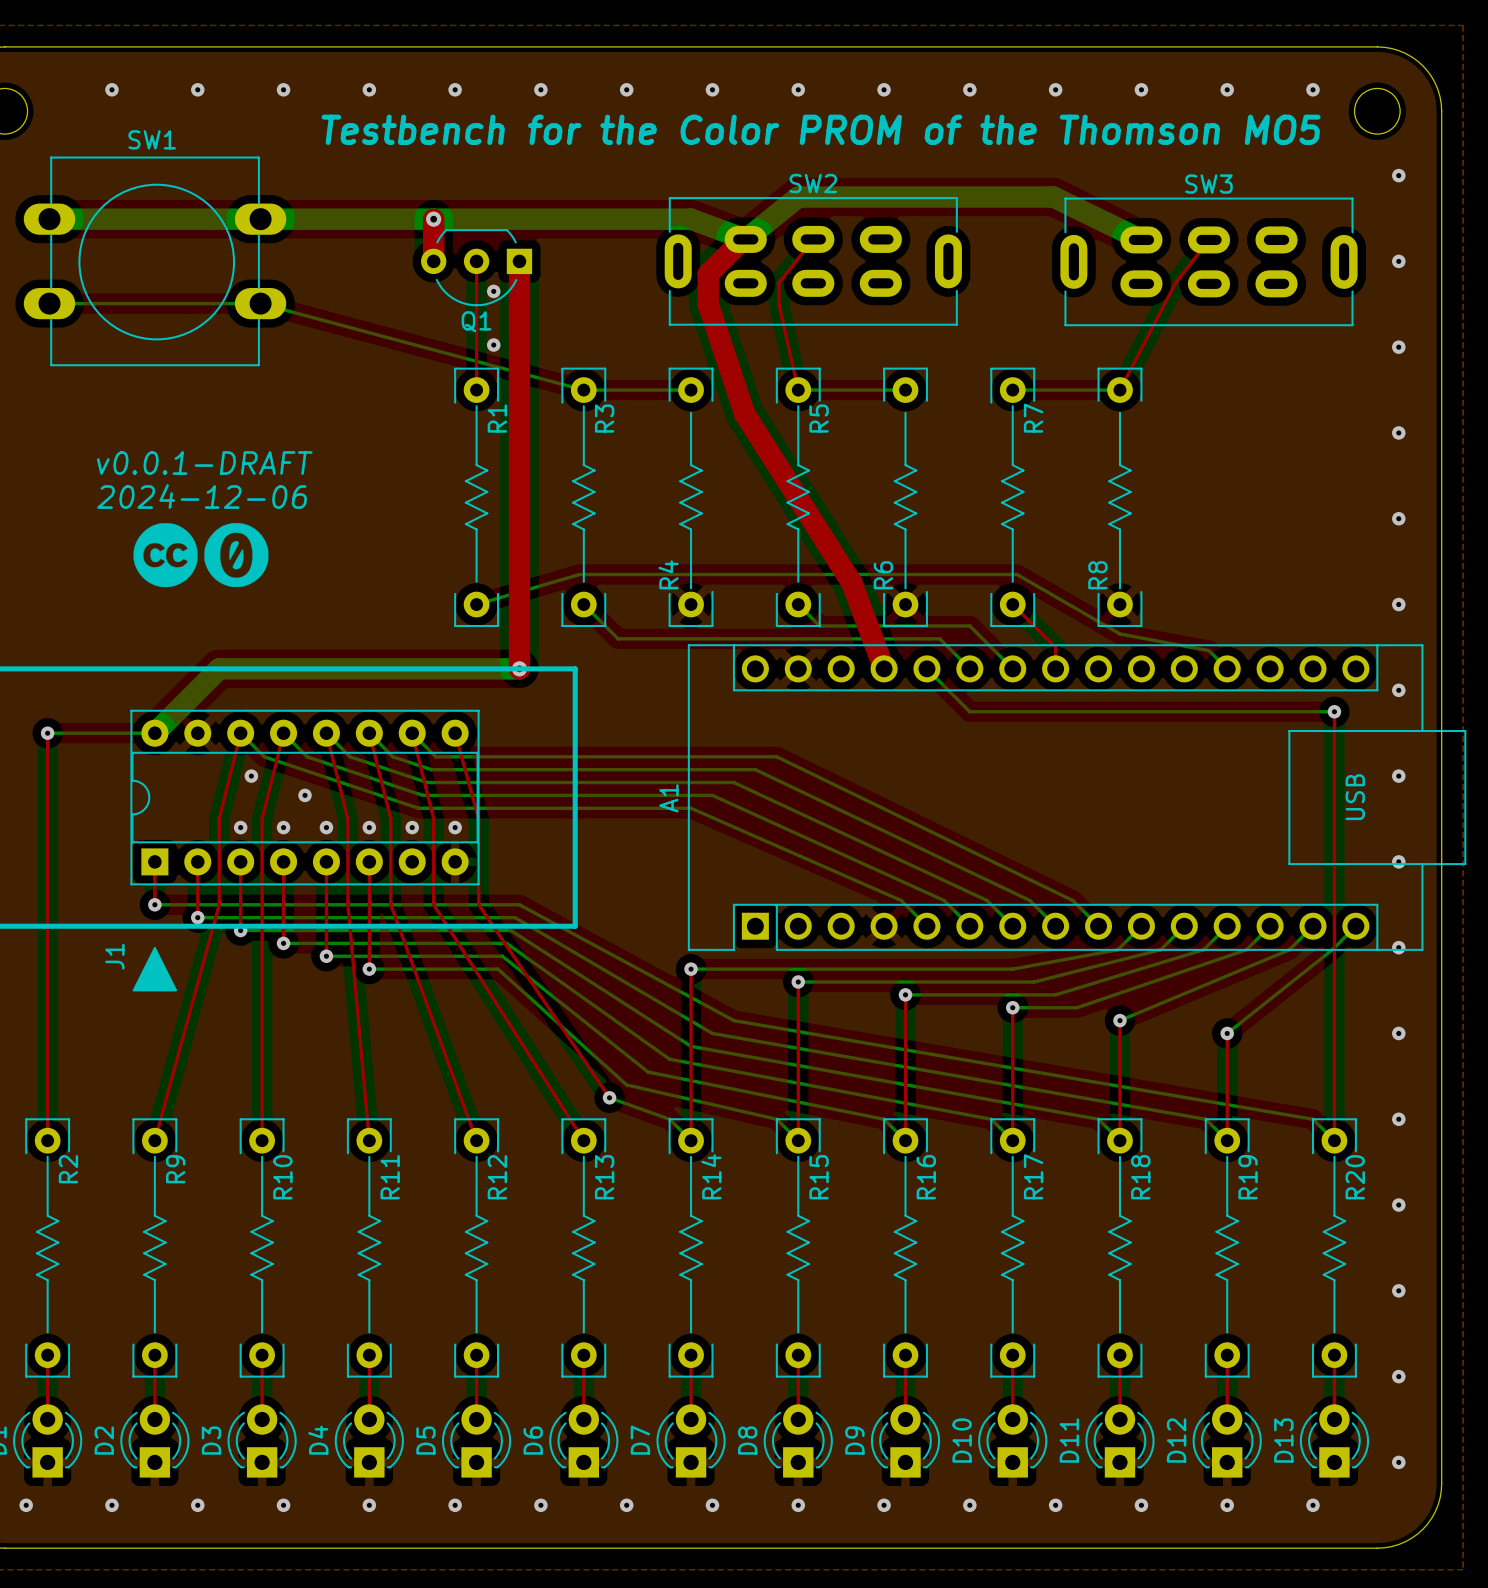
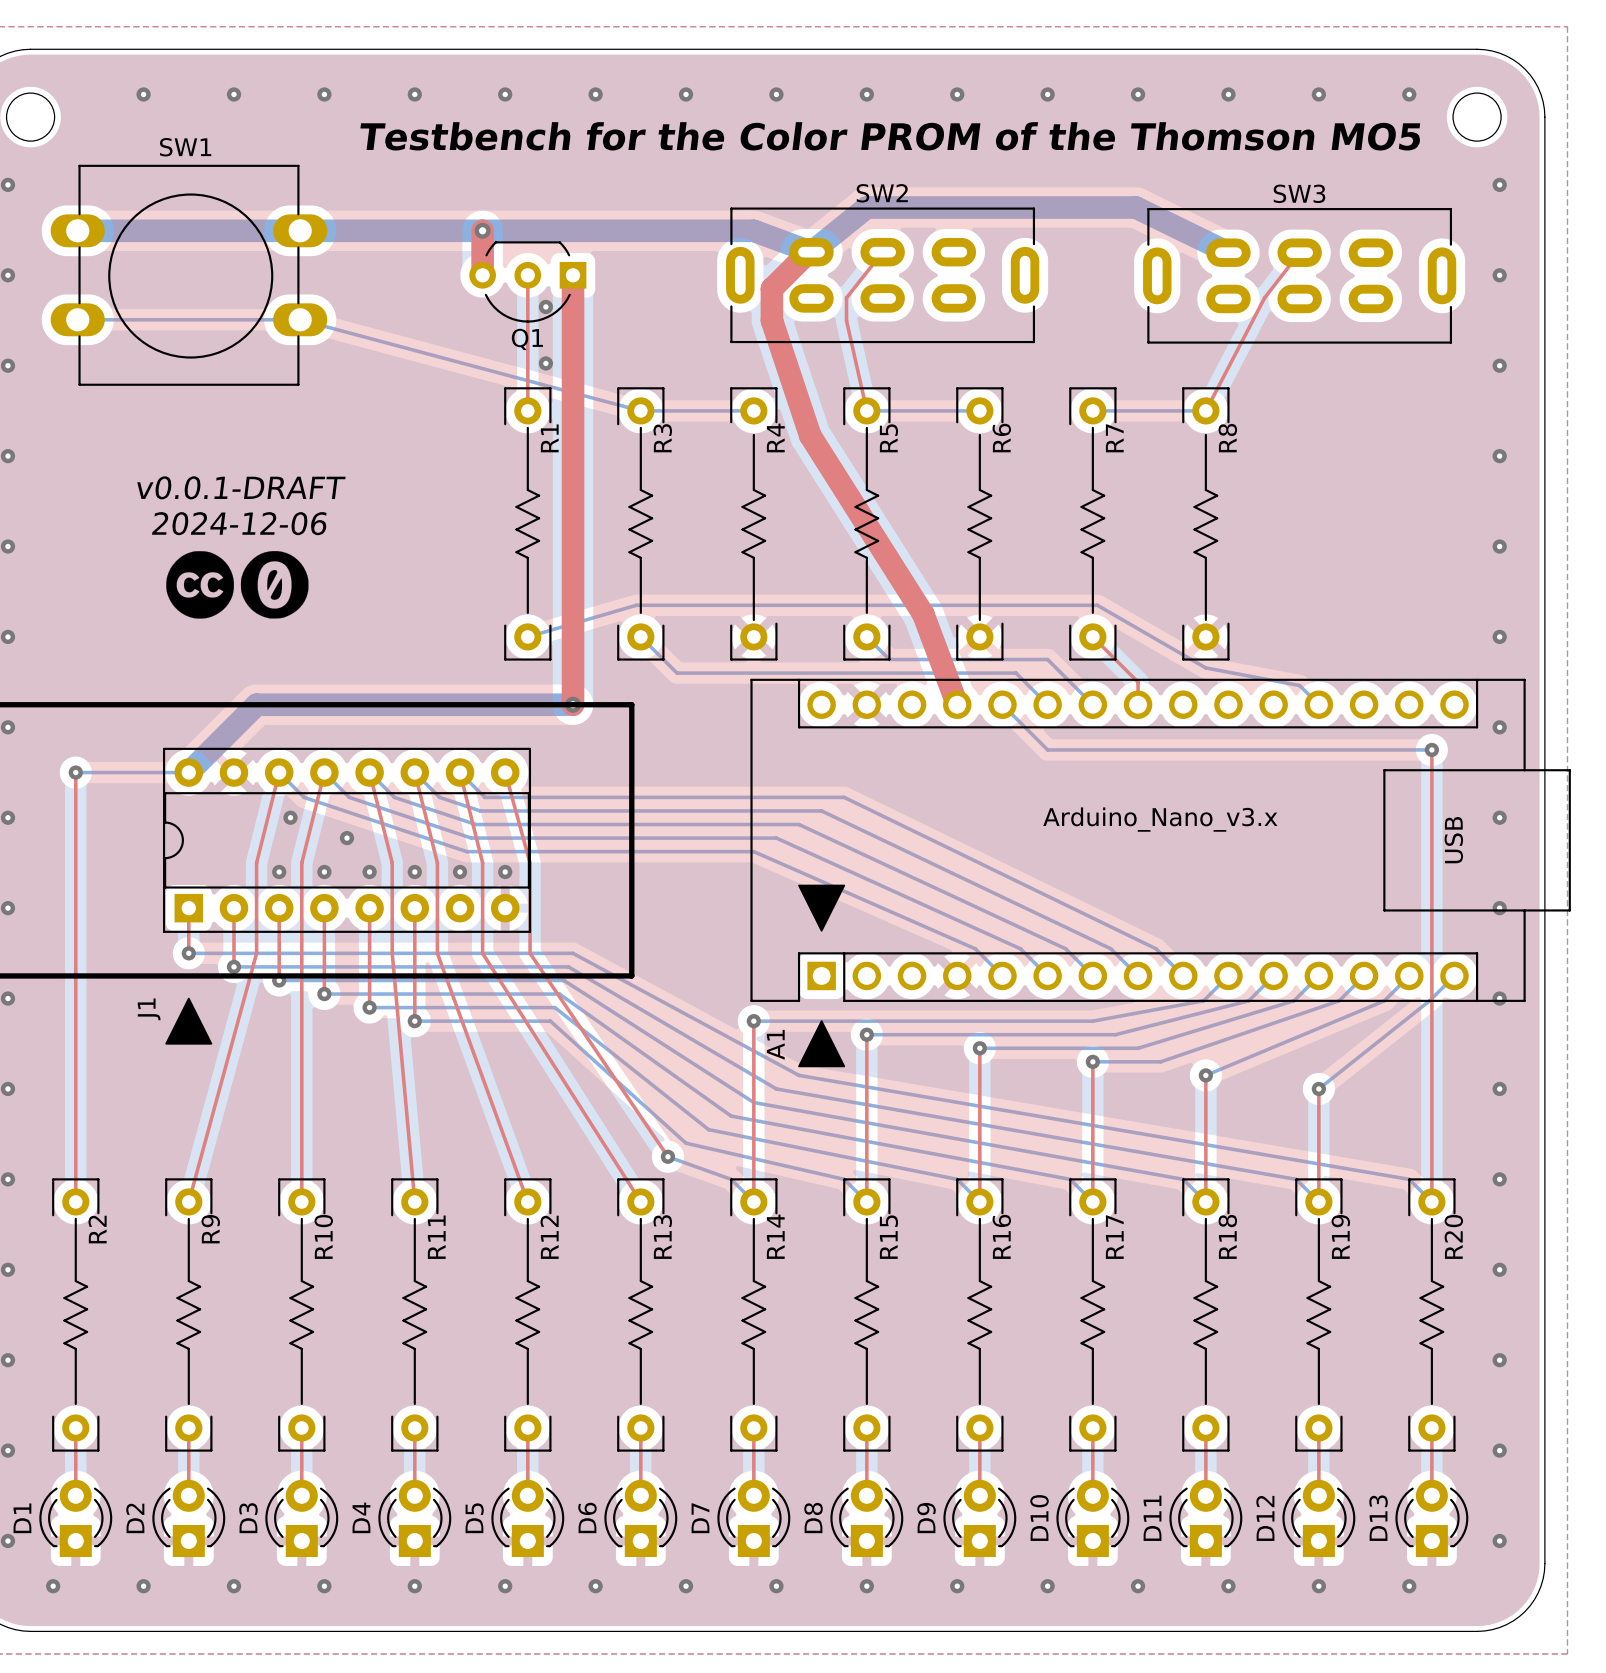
R4 name position: R4 (668, 574) -> R4 (775, 437)
R6 name position: R6 (883, 575) -> R6 (1001, 438)
R8 name position: R8 (1097, 575) -> R8 (1227, 438)
A1 value: none -> Arduino_Nano_v3.x (1160, 819)
A1 name position: A1 (668, 798) -> A1 (775, 1044)
drawing: none -> [798, 884, 846, 932]
drawing: none -> [798, 1020, 846, 1068]

